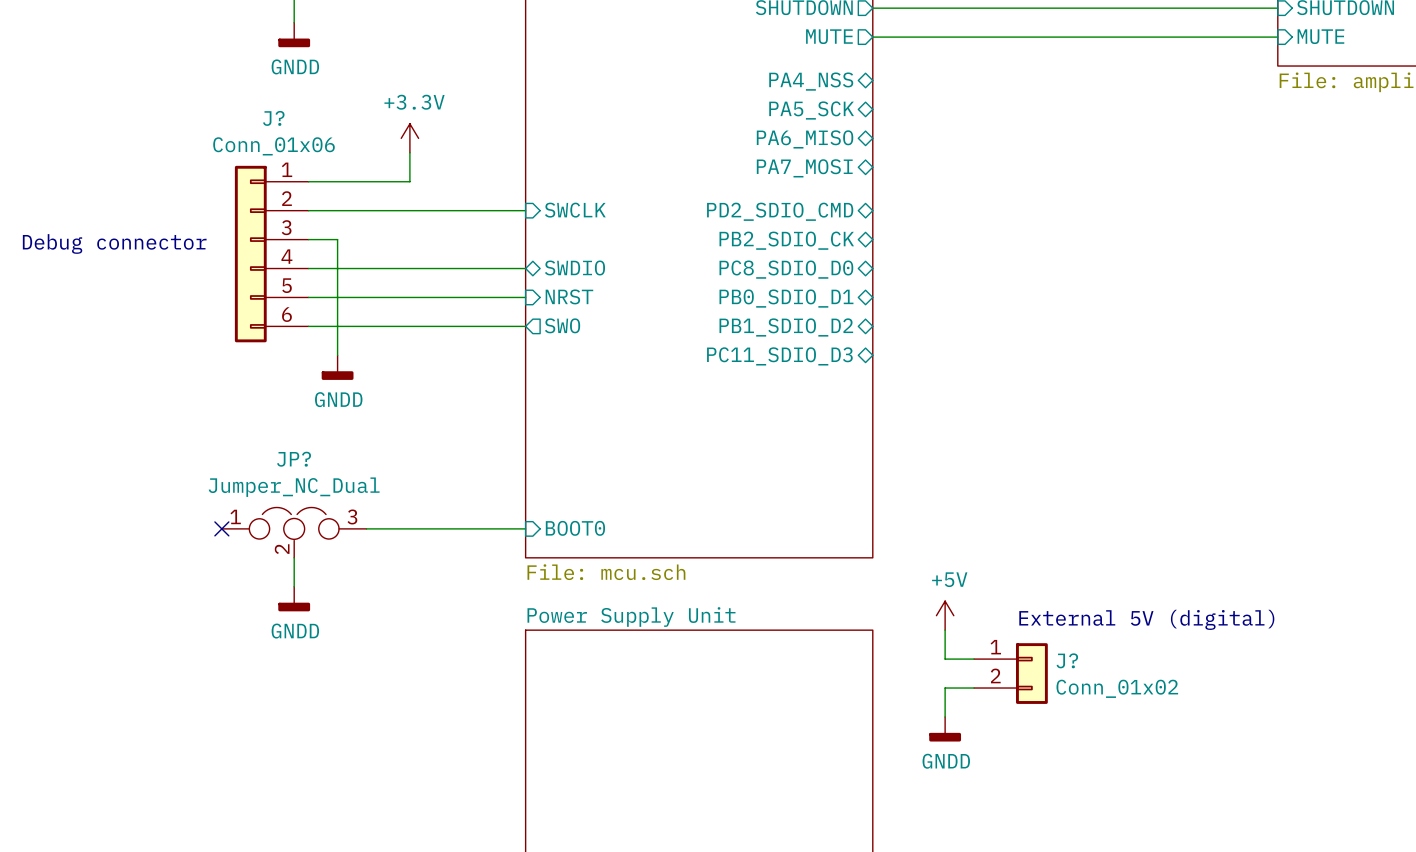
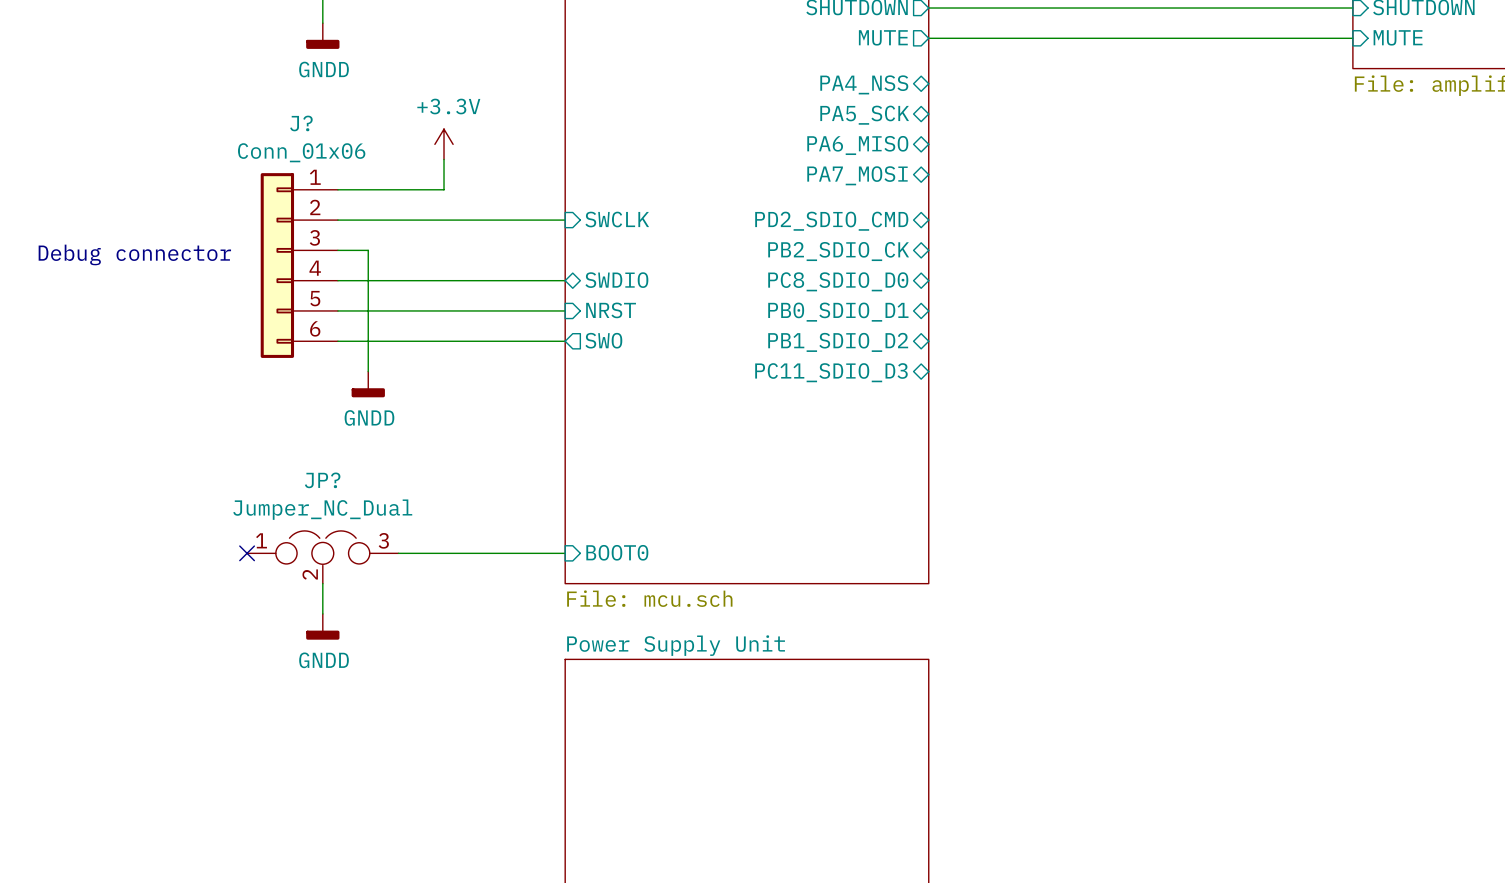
power symbol: +5V (945, 615) -> none
text: External 5V (digital) (1146, 619) -> none
wire: (945, 630) (945, 659) (974, 659) -> none
J?: Conn_01x02 (1010, 673) -> none
wire: (974, 688) (945, 688) (945, 716) -> none
power symbol: GNDD (945, 729) -> none

